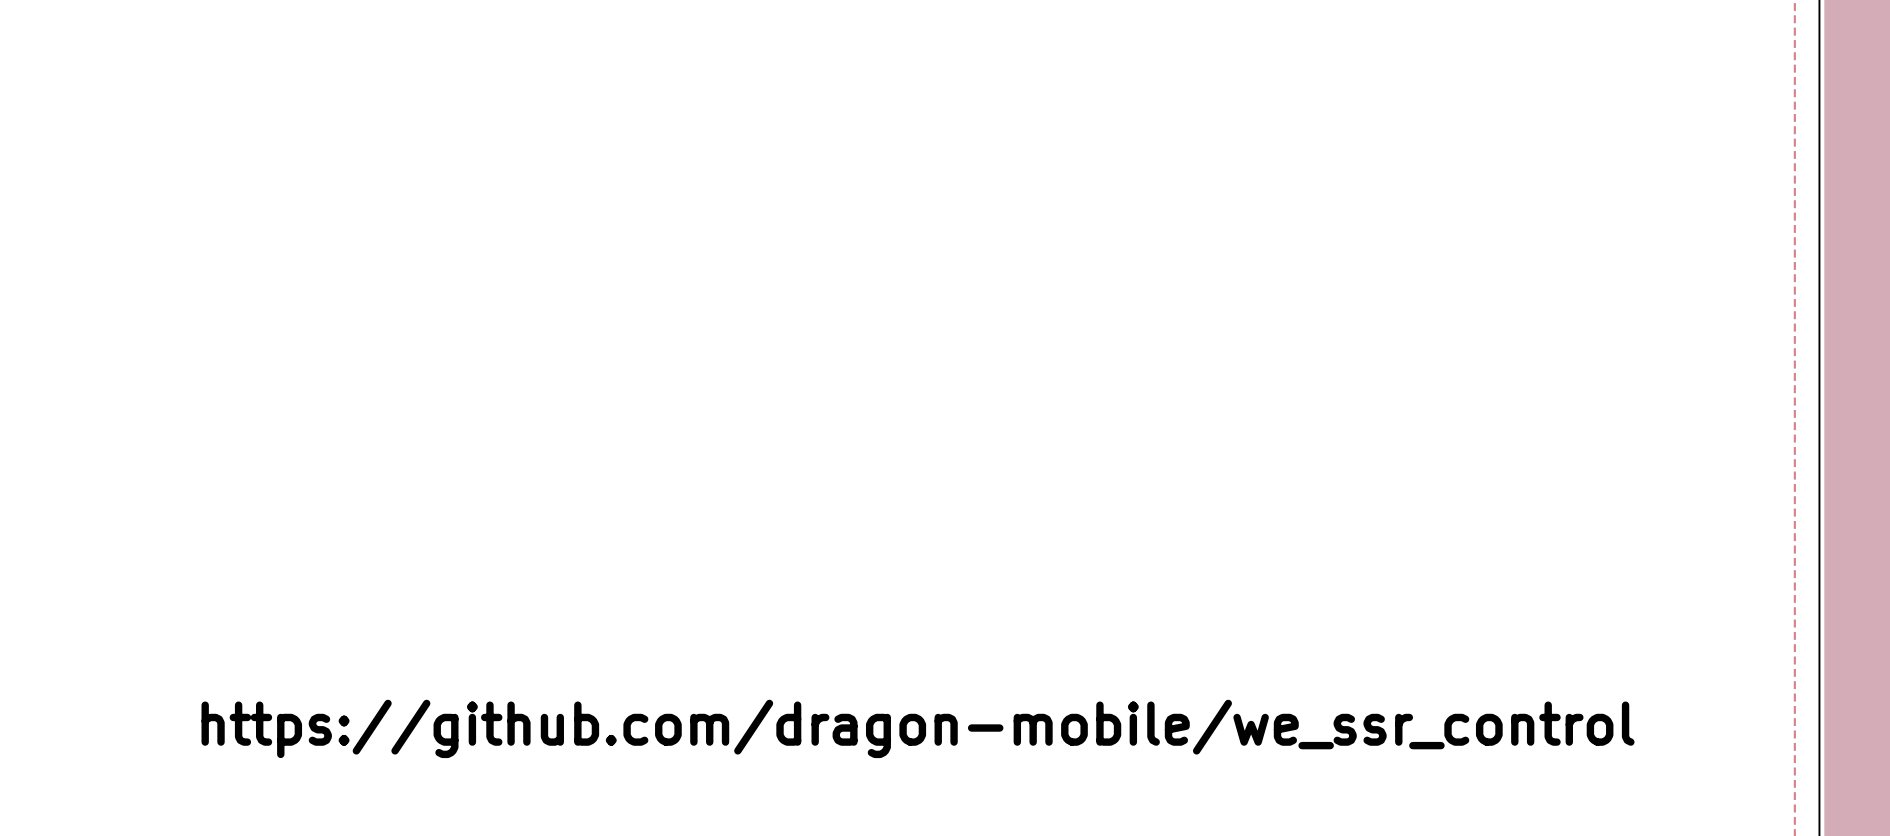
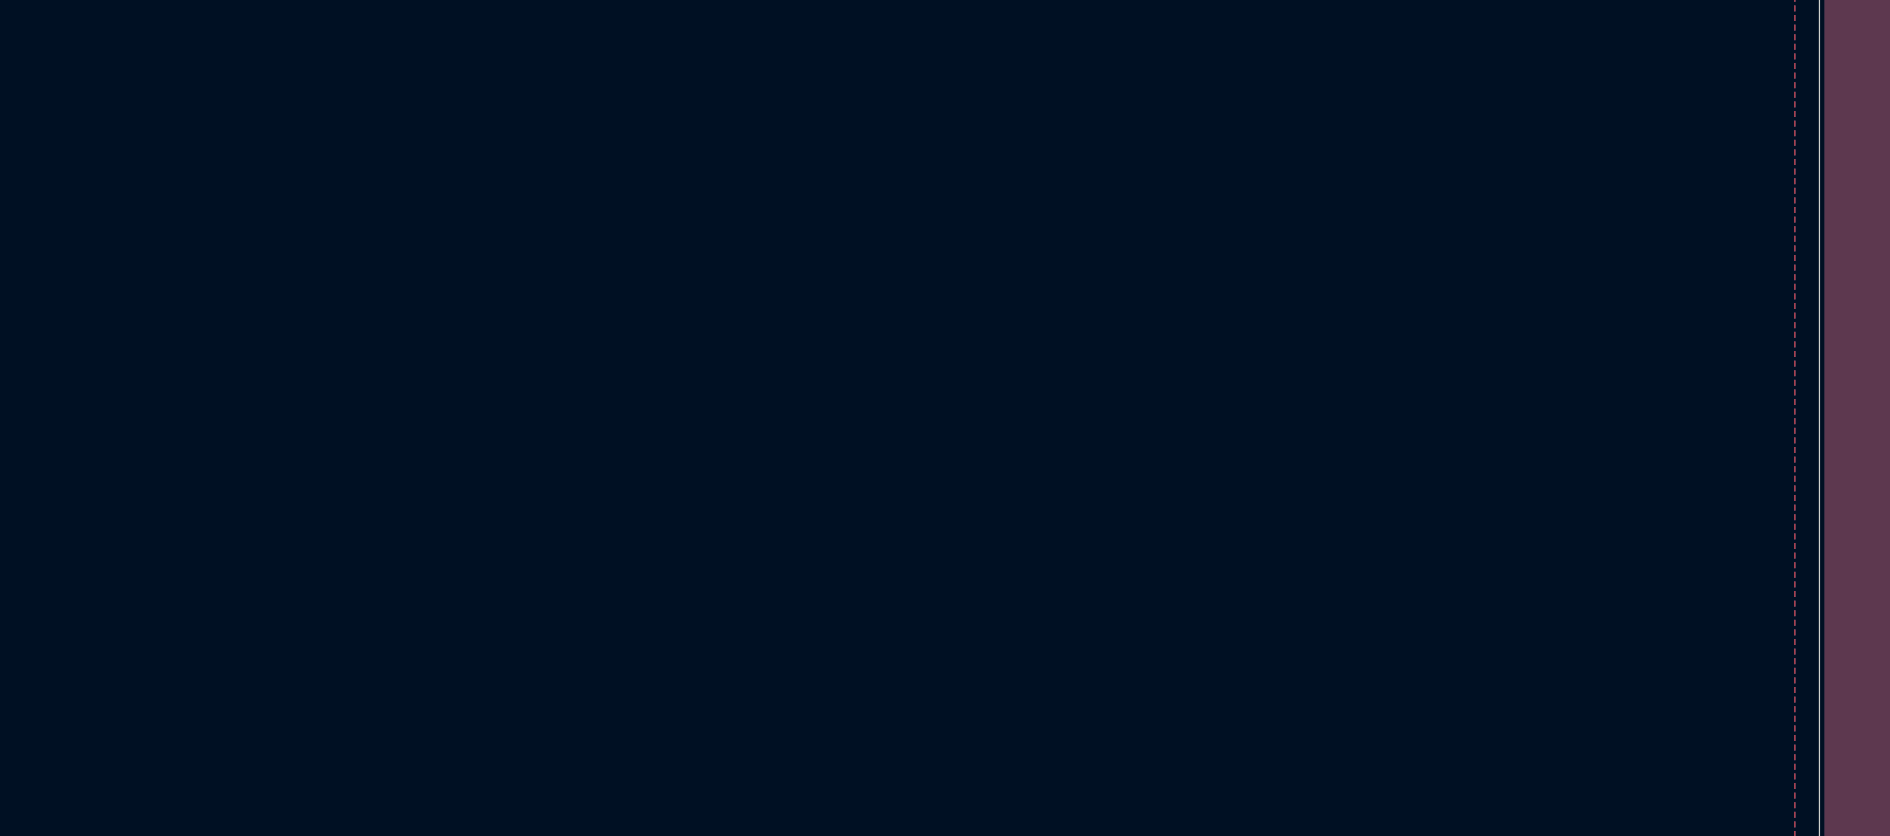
text: https://github.com/dragon-mobile/we_ssr_control (918, 728) -> none

